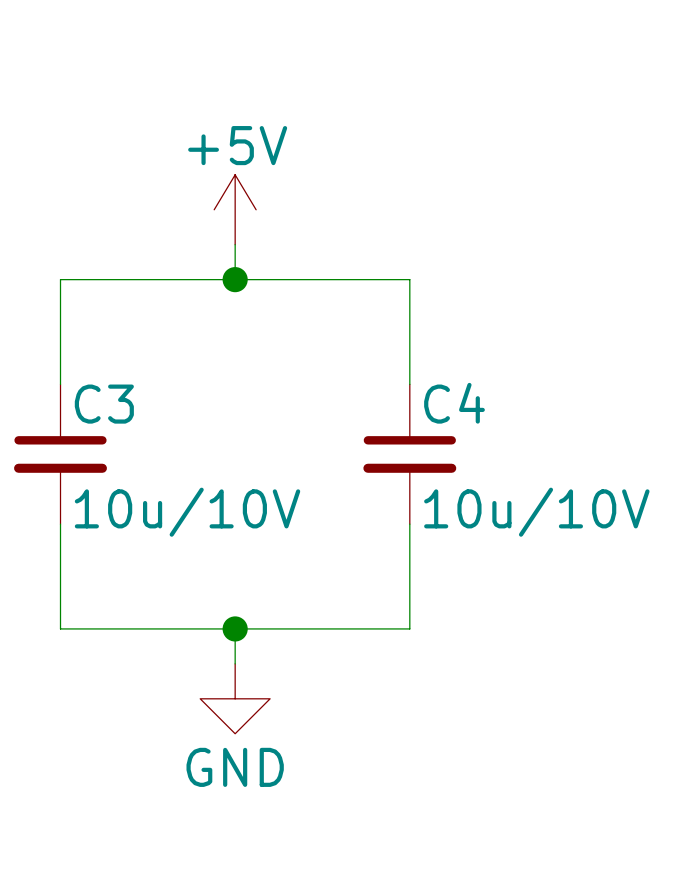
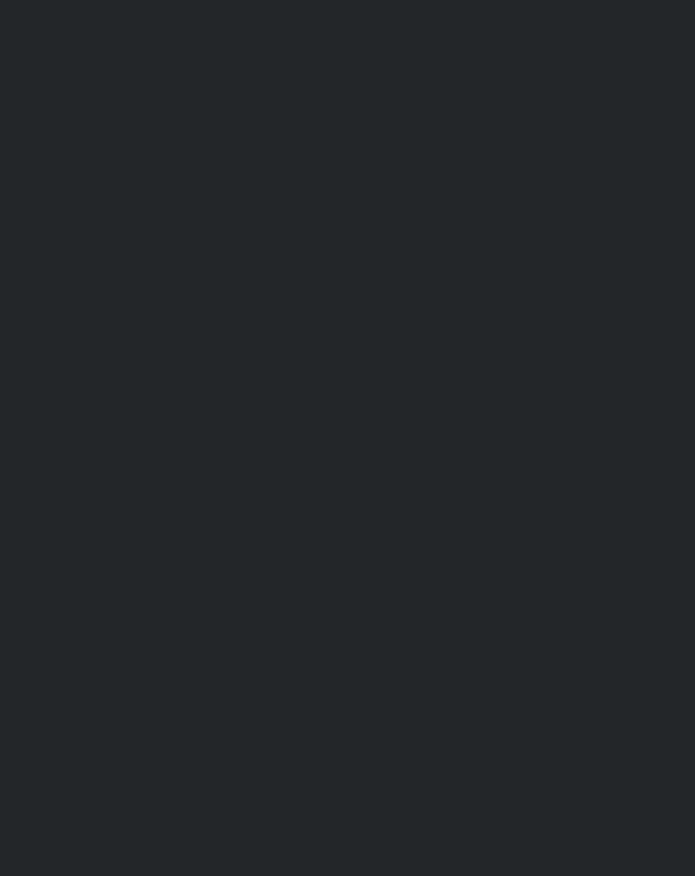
power symbol: +5V (235, 209) -> none
wire: (235, 244) (235, 279) -> none
junction: (235, 279) -> none
wire: (60, 384) (60, 279) (409, 279) (409, 384) -> none
C3: 10u/10V (60, 454) -> none
C4: 10u/10V (409, 454) -> none
wire: (60, 524) (60, 628) (409, 628) (409, 524) -> none
wire: (235, 628) (235, 663) -> none
junction: (235, 628) -> none
power symbol: GND (235, 698) -> none

